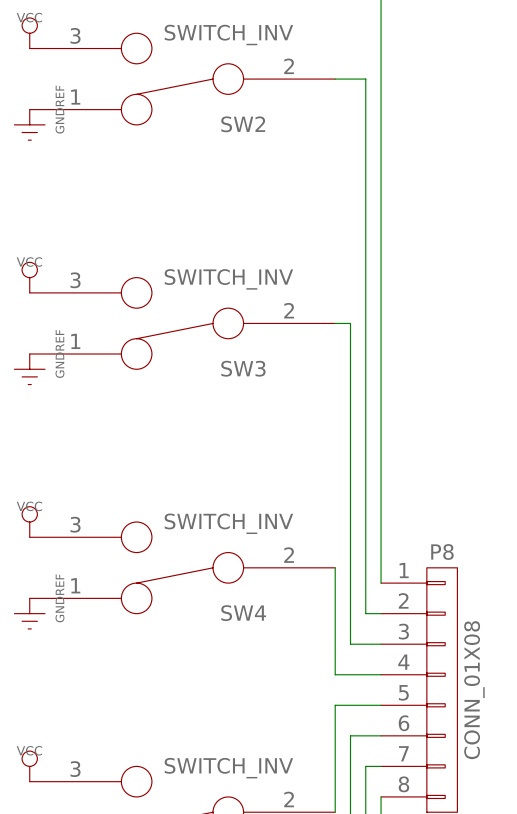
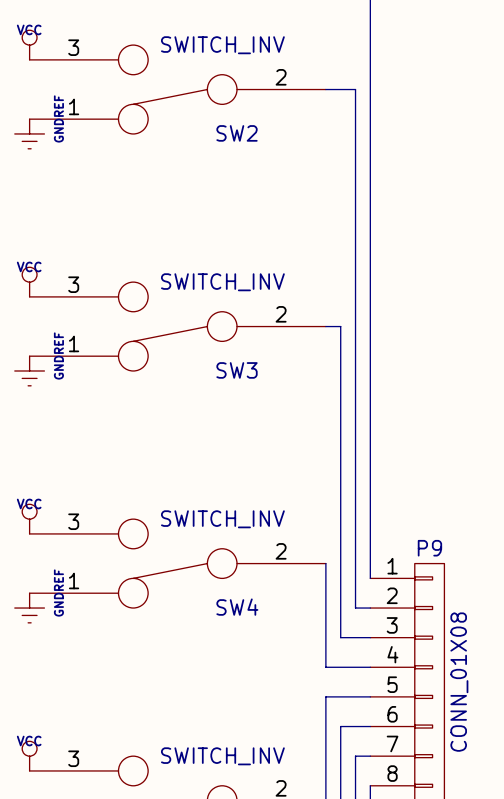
P8 name: P8 (442, 552) -> P9 (429, 548)

